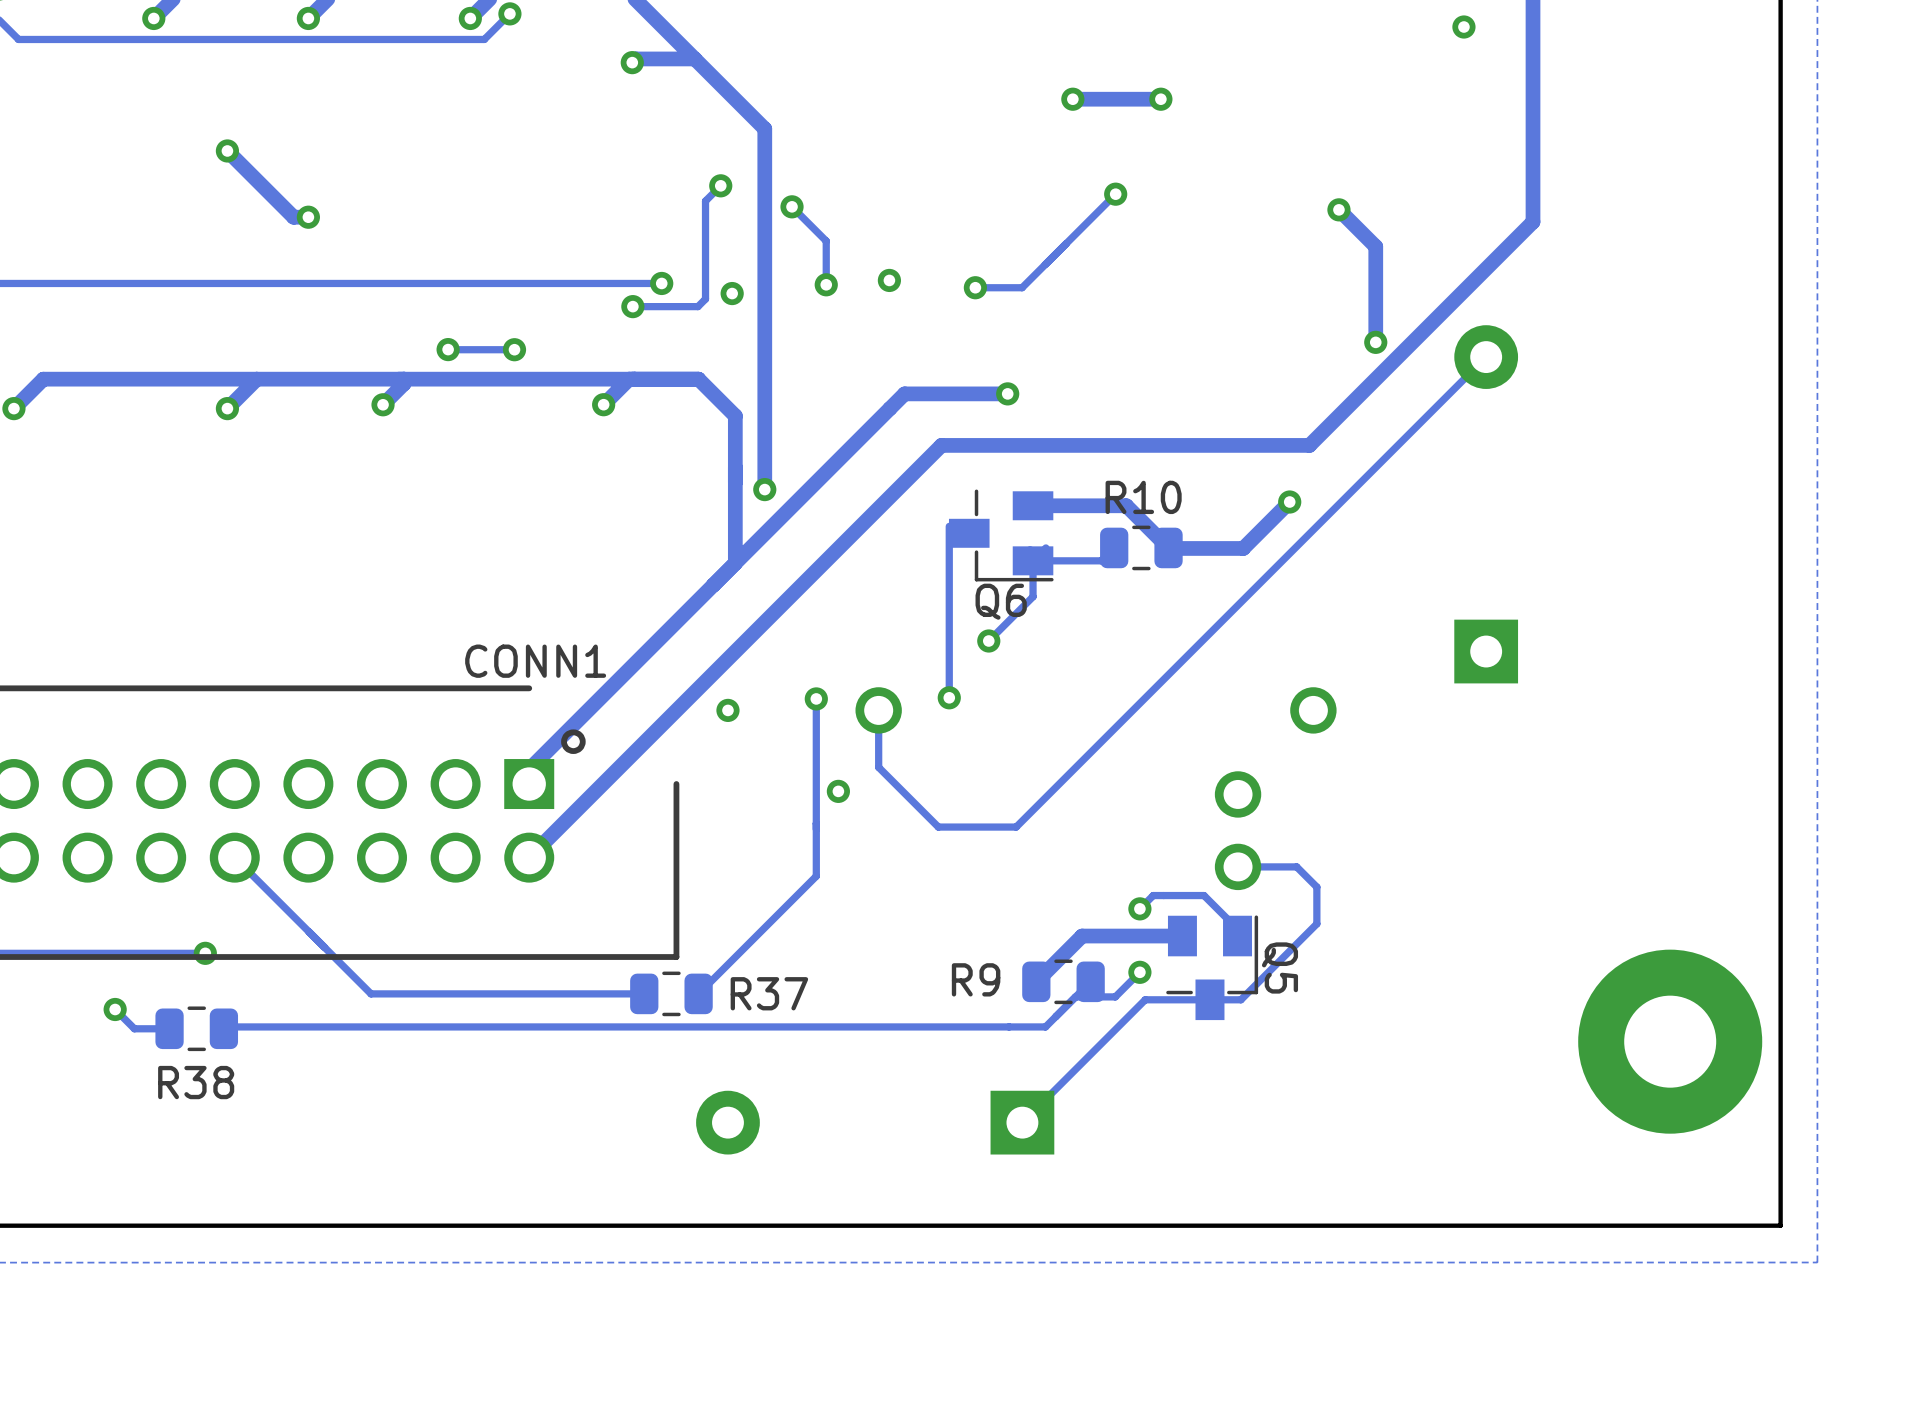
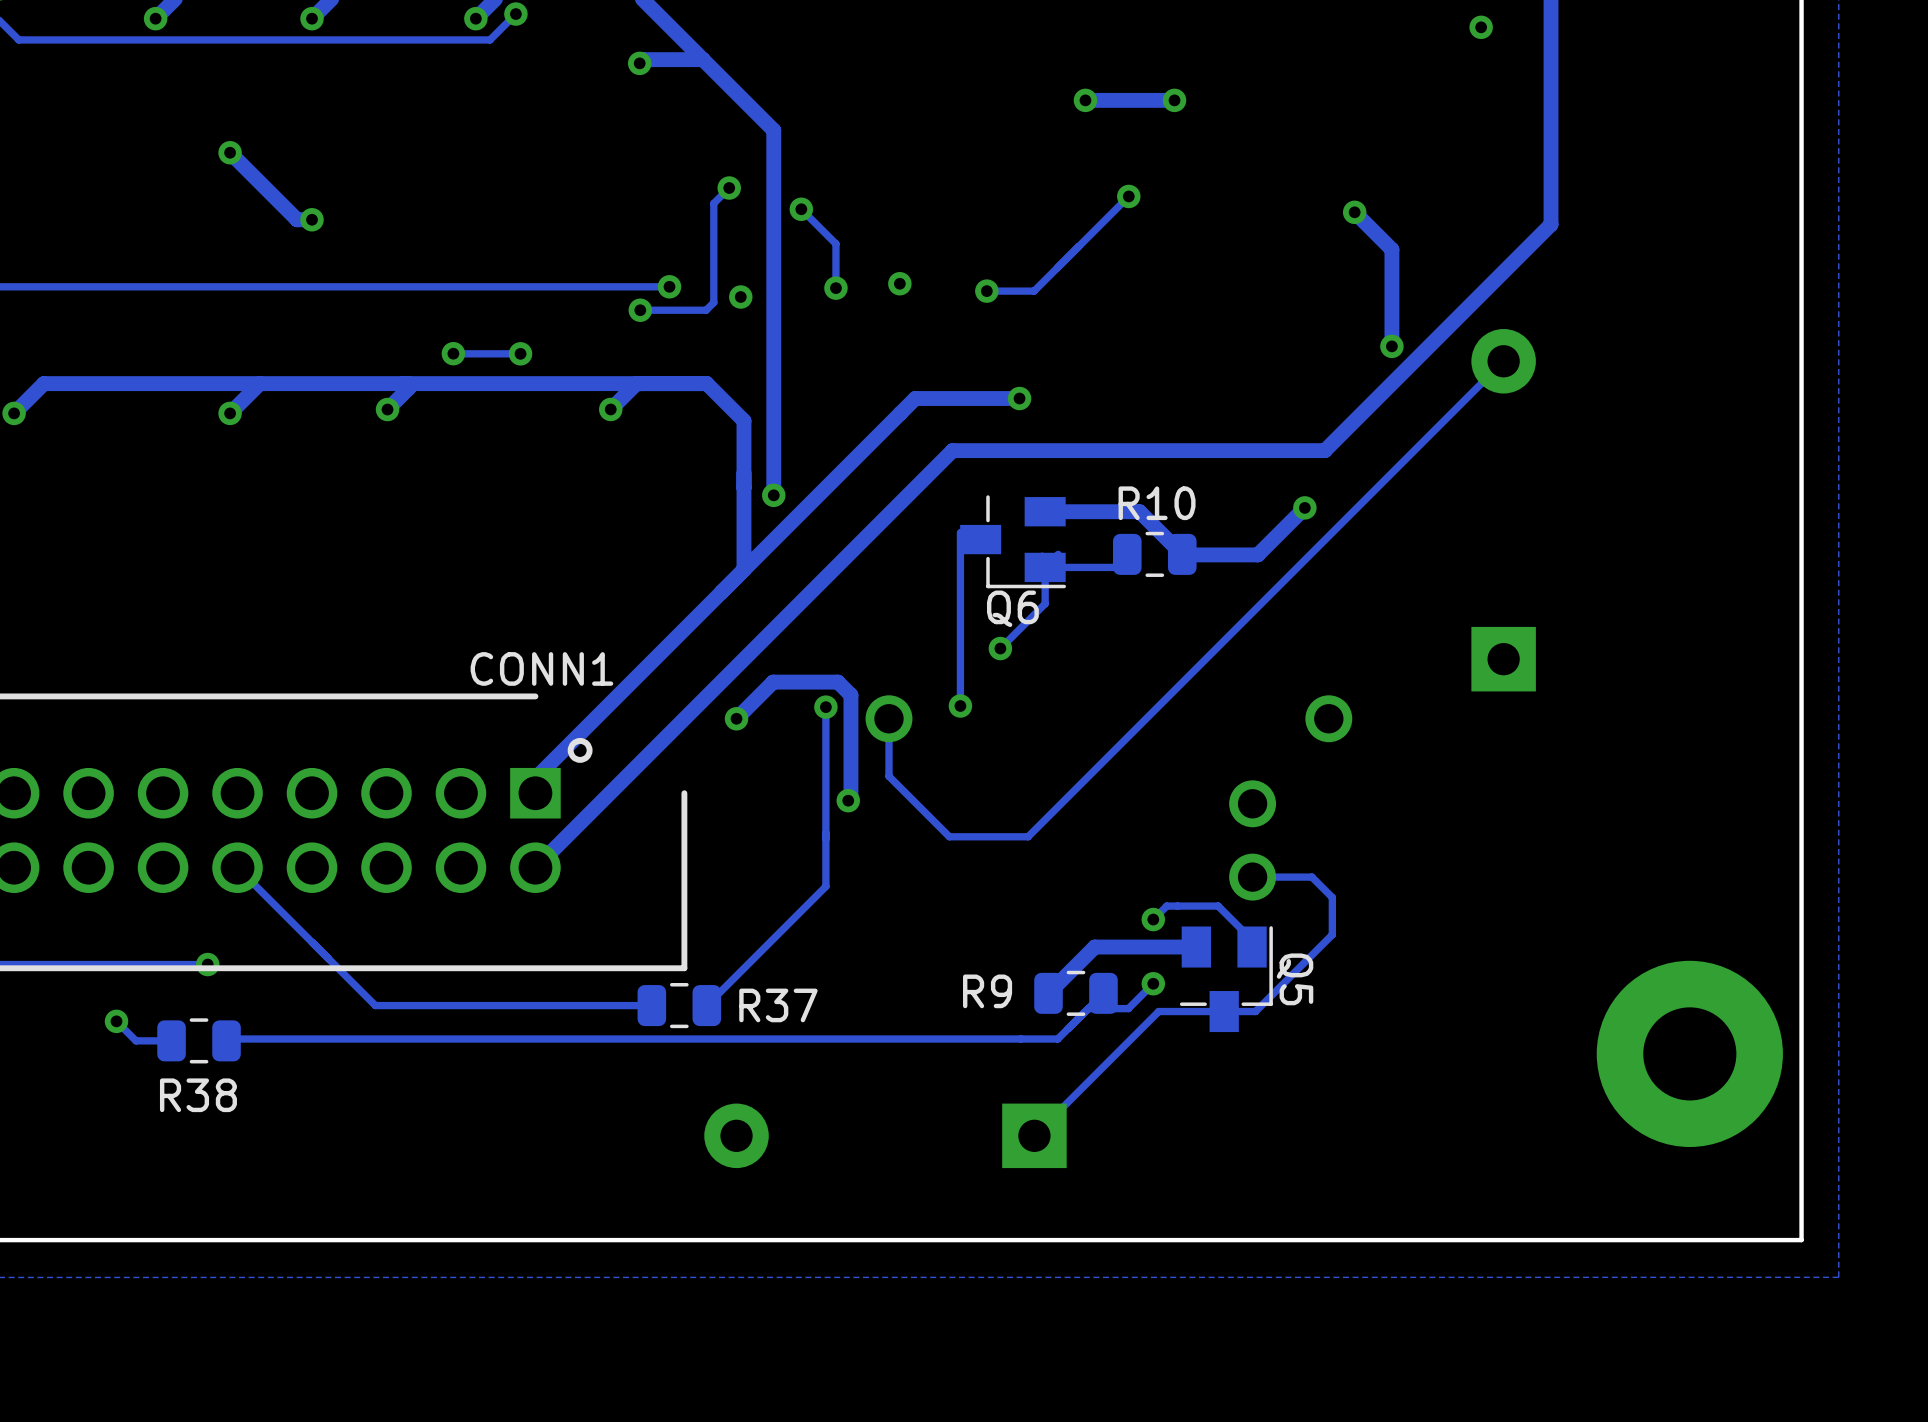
track: none -> (736, 718) (773, 682) (837, 682) (850, 695) (850, 797) (848, 800)

